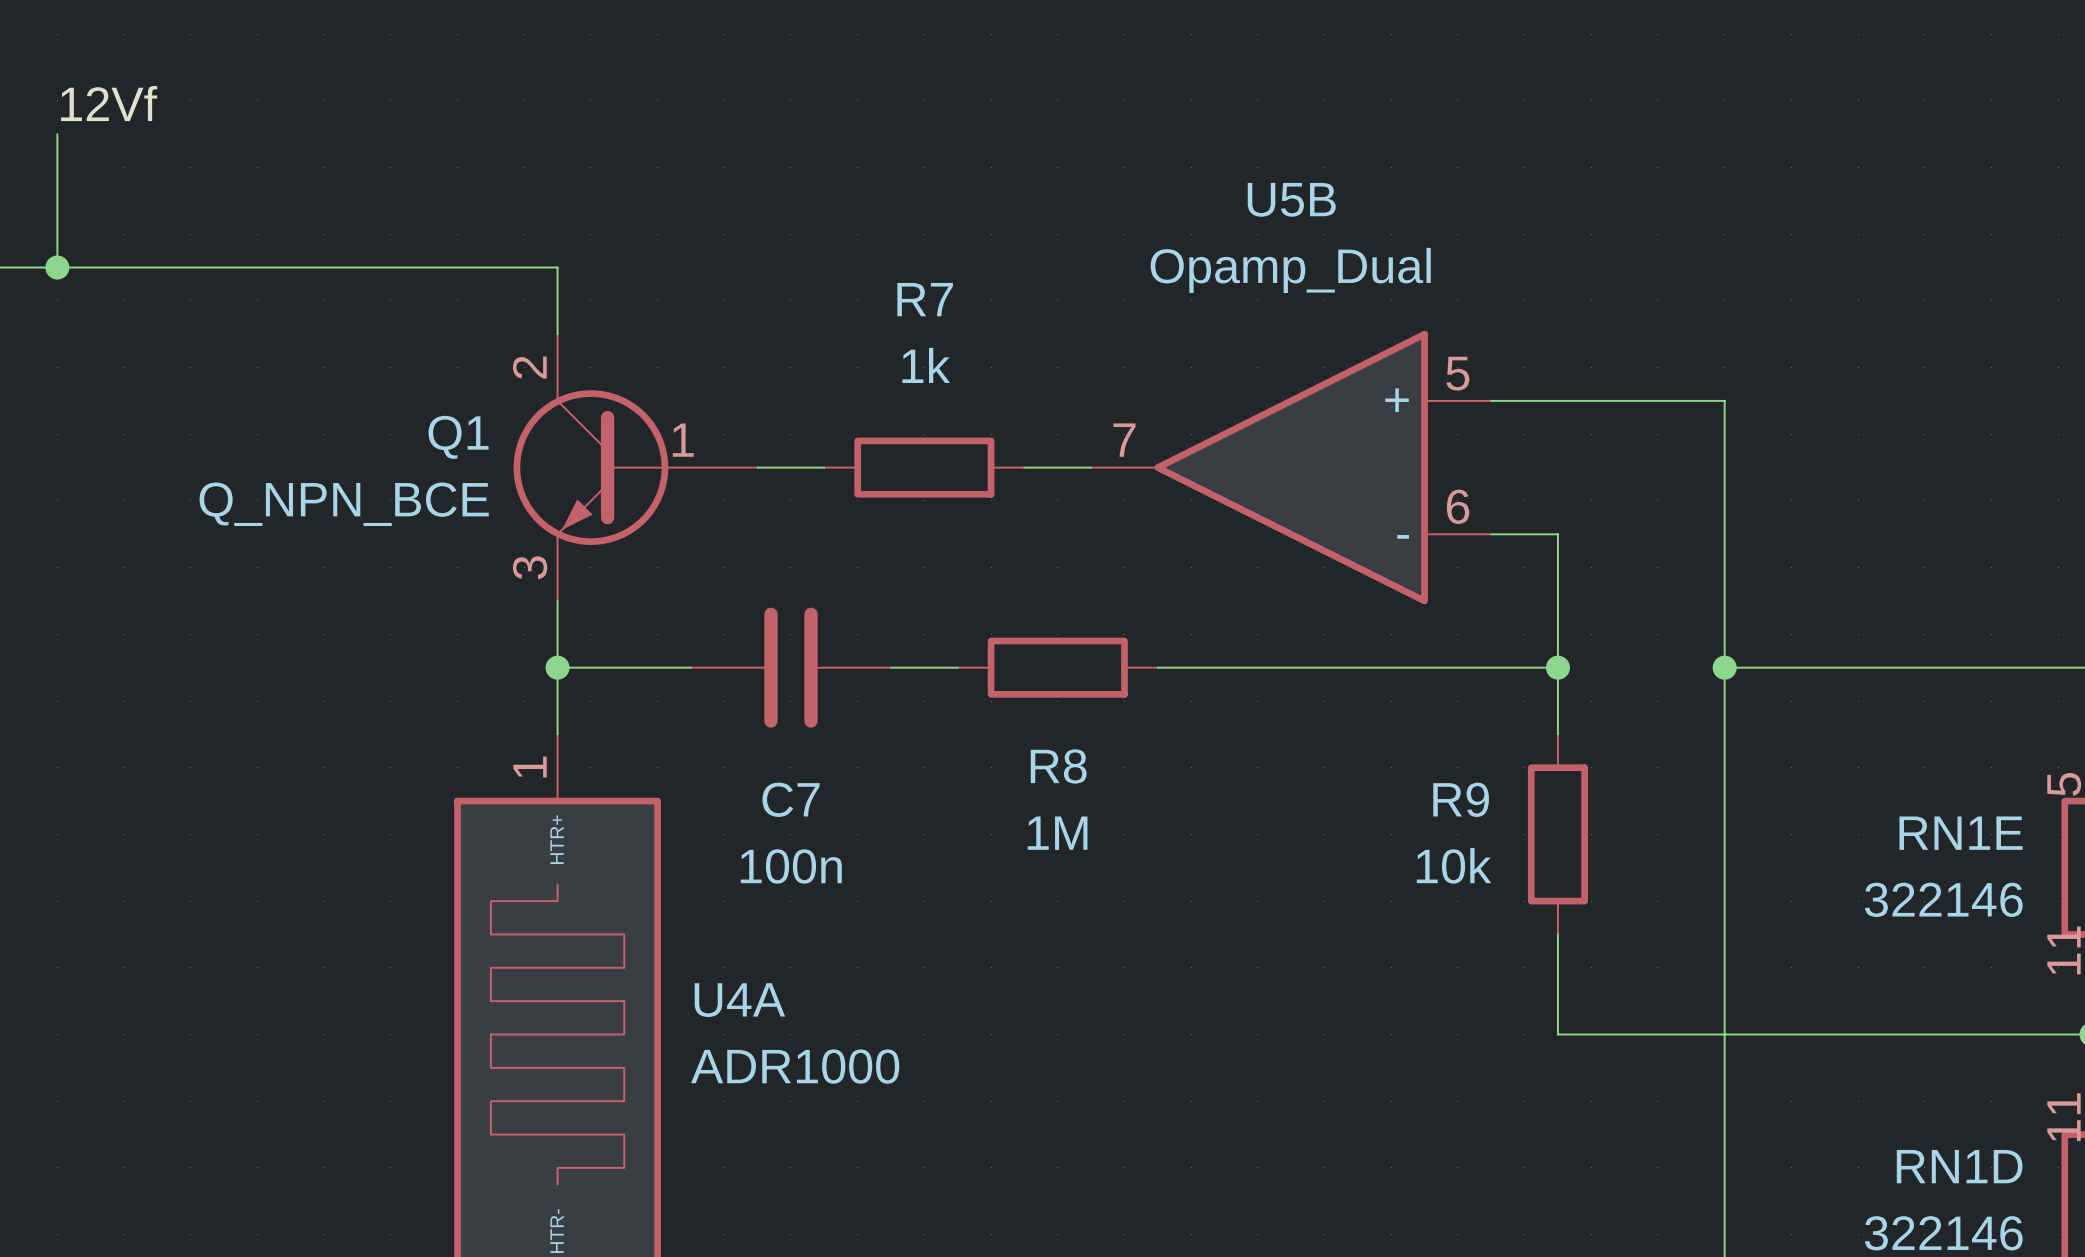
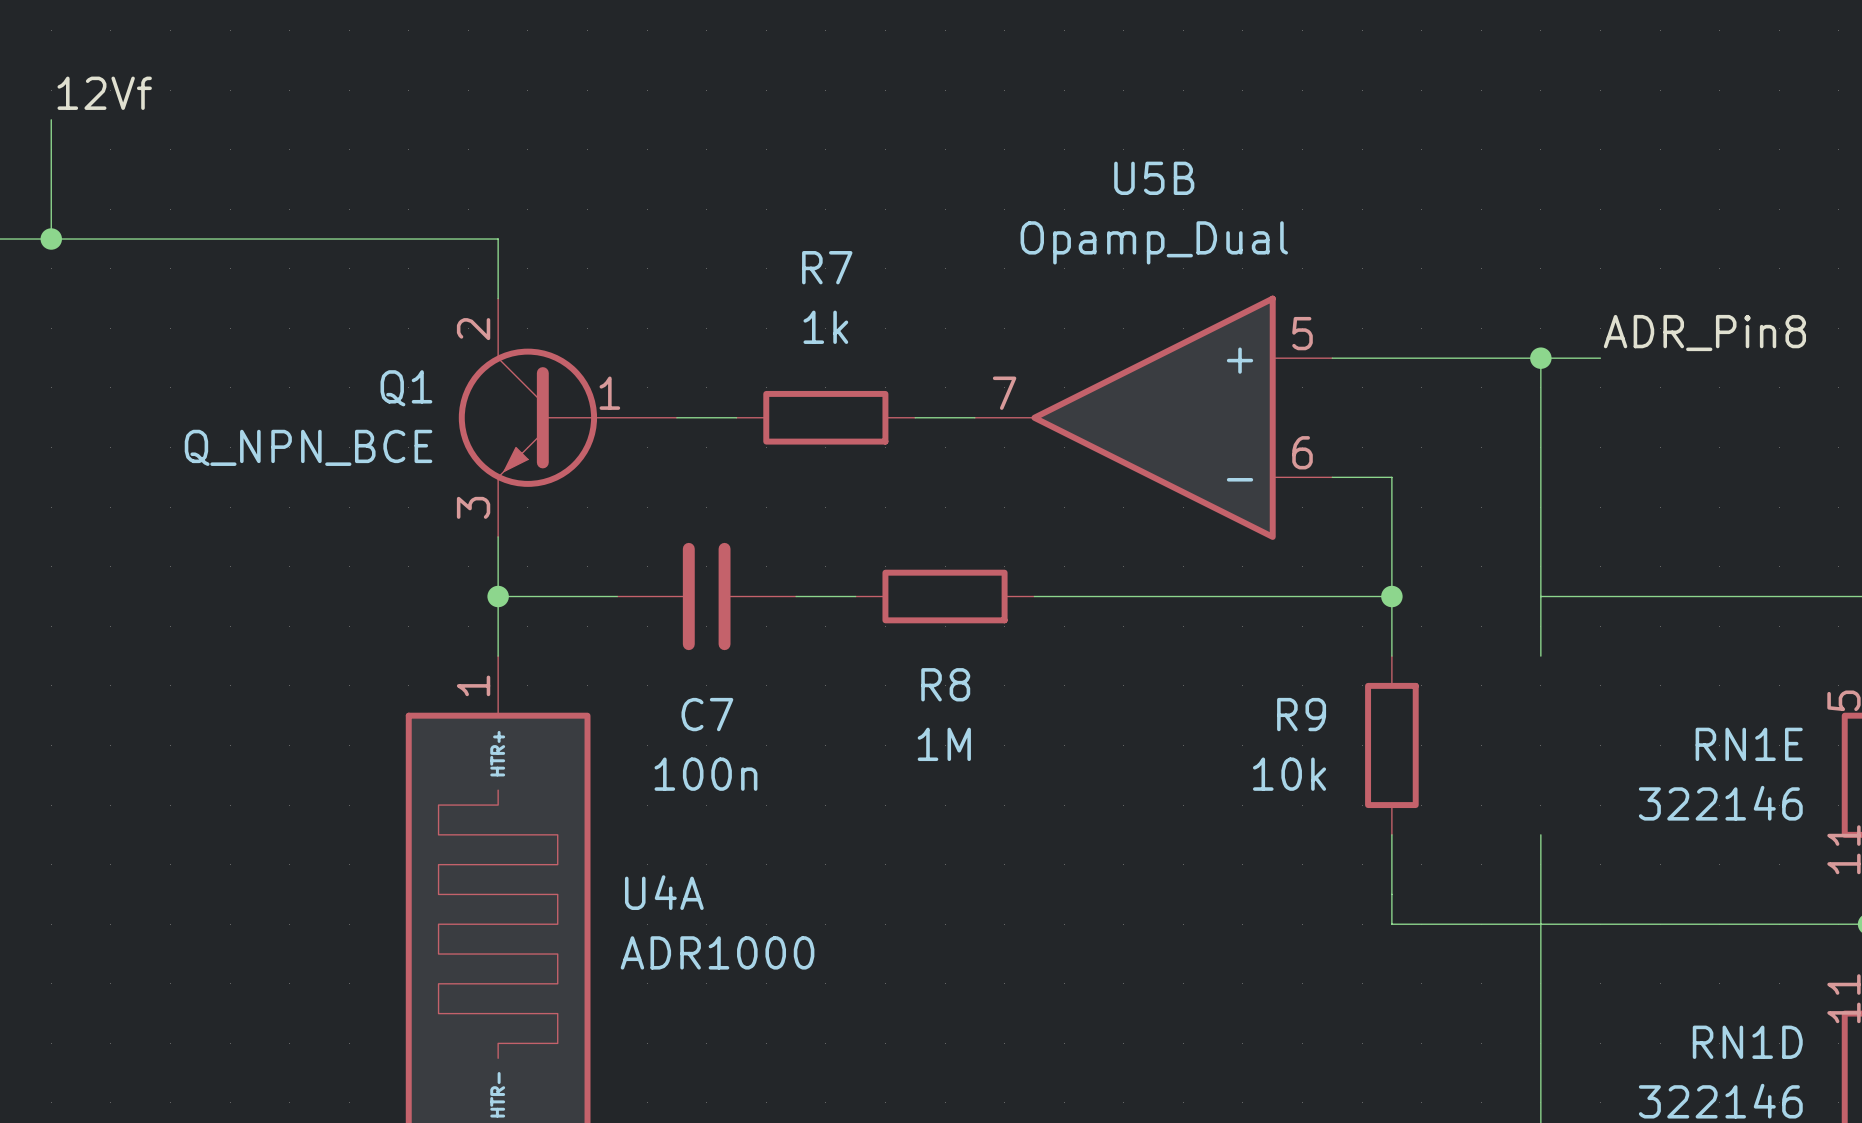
label: none -> ADR_Pin8 (1704, 333)
wire: none -> (1540, 358) (1600, 358)
junction: none -> (1540, 358)
junction: (1724, 667) -> none
wire: (1724, 734) (1724, 934) -> none

